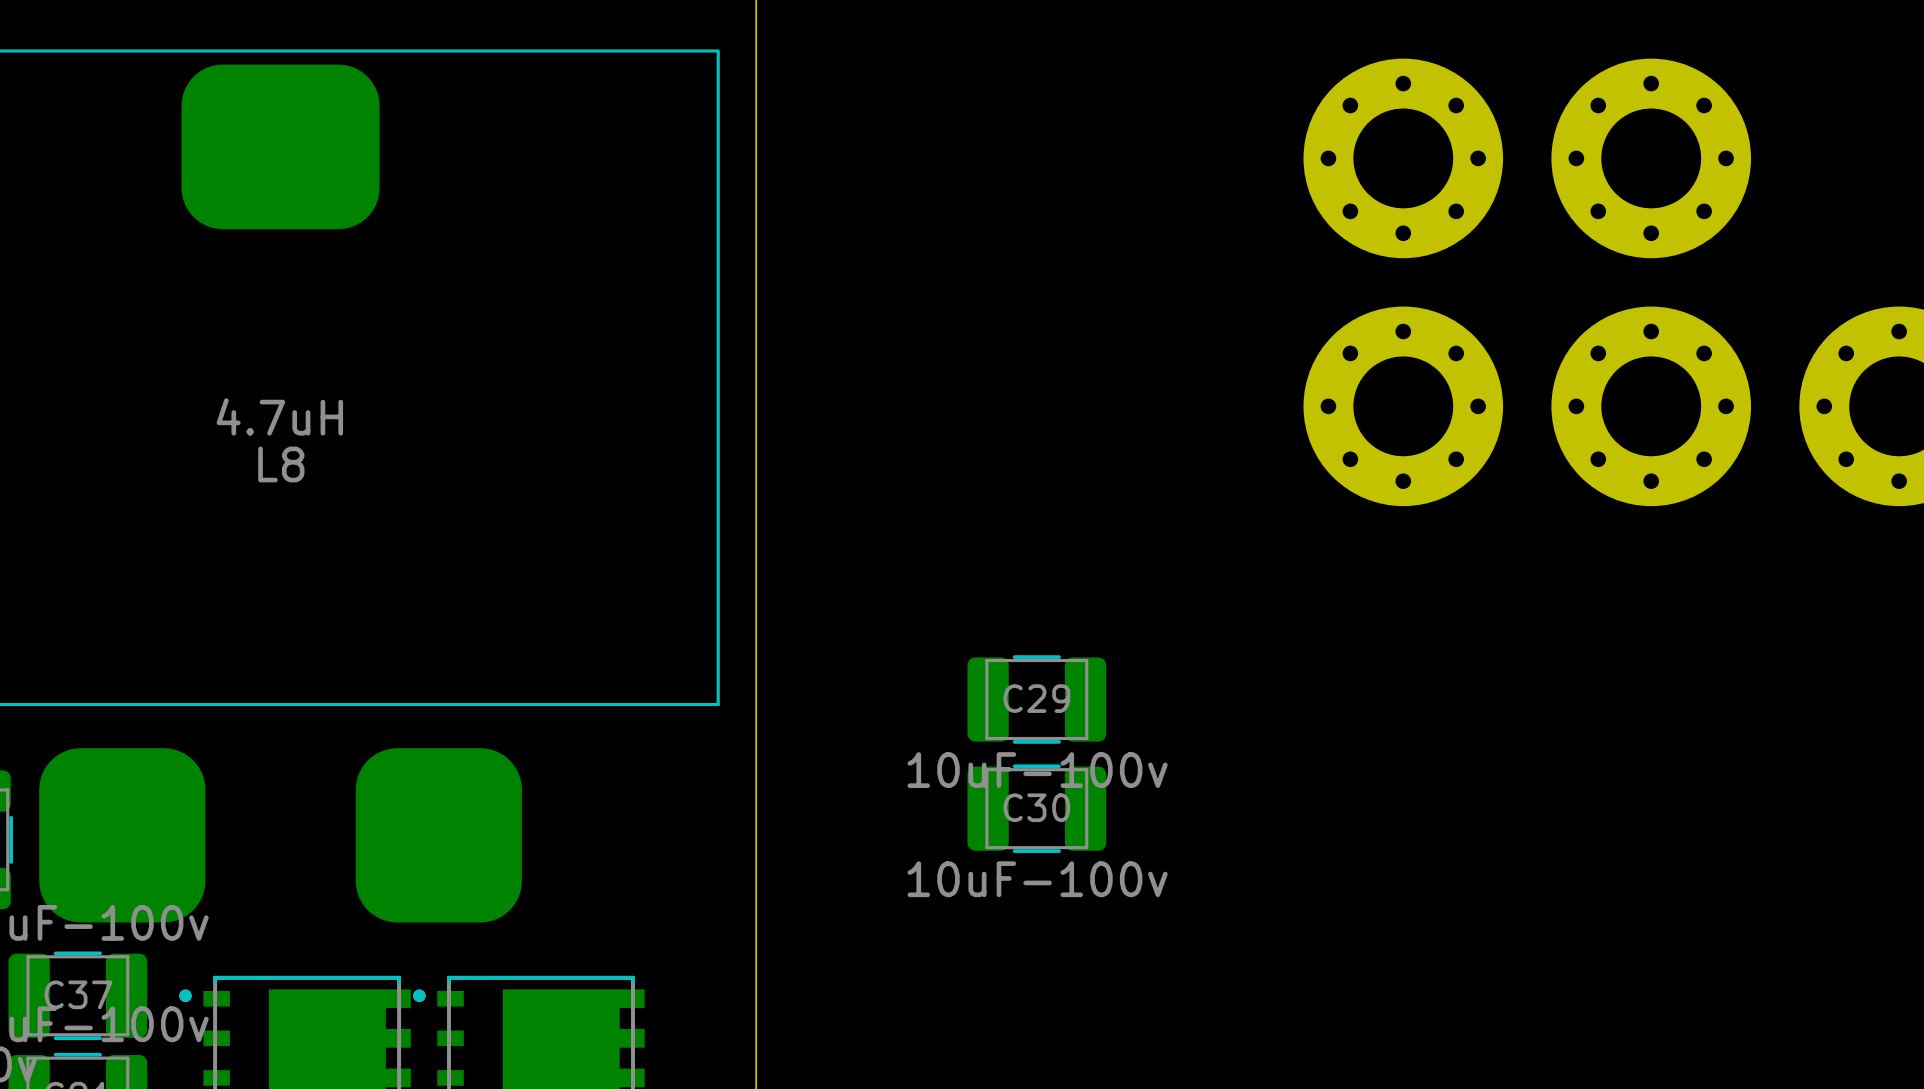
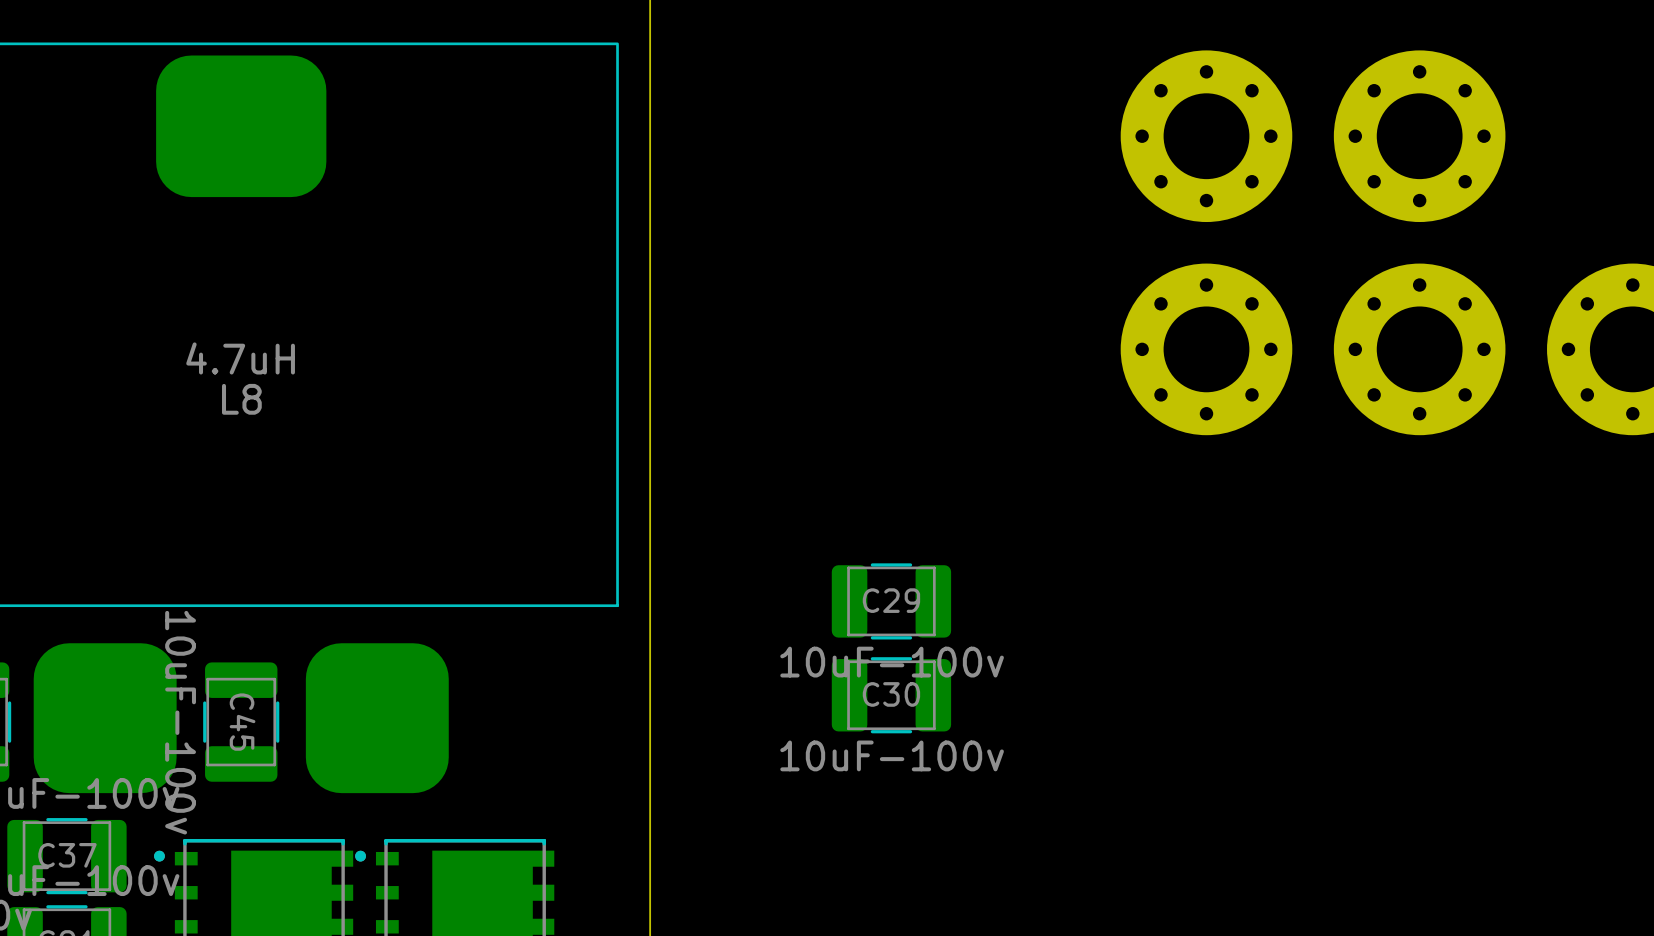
C45: none -> 10uF-100v (241, 722)

